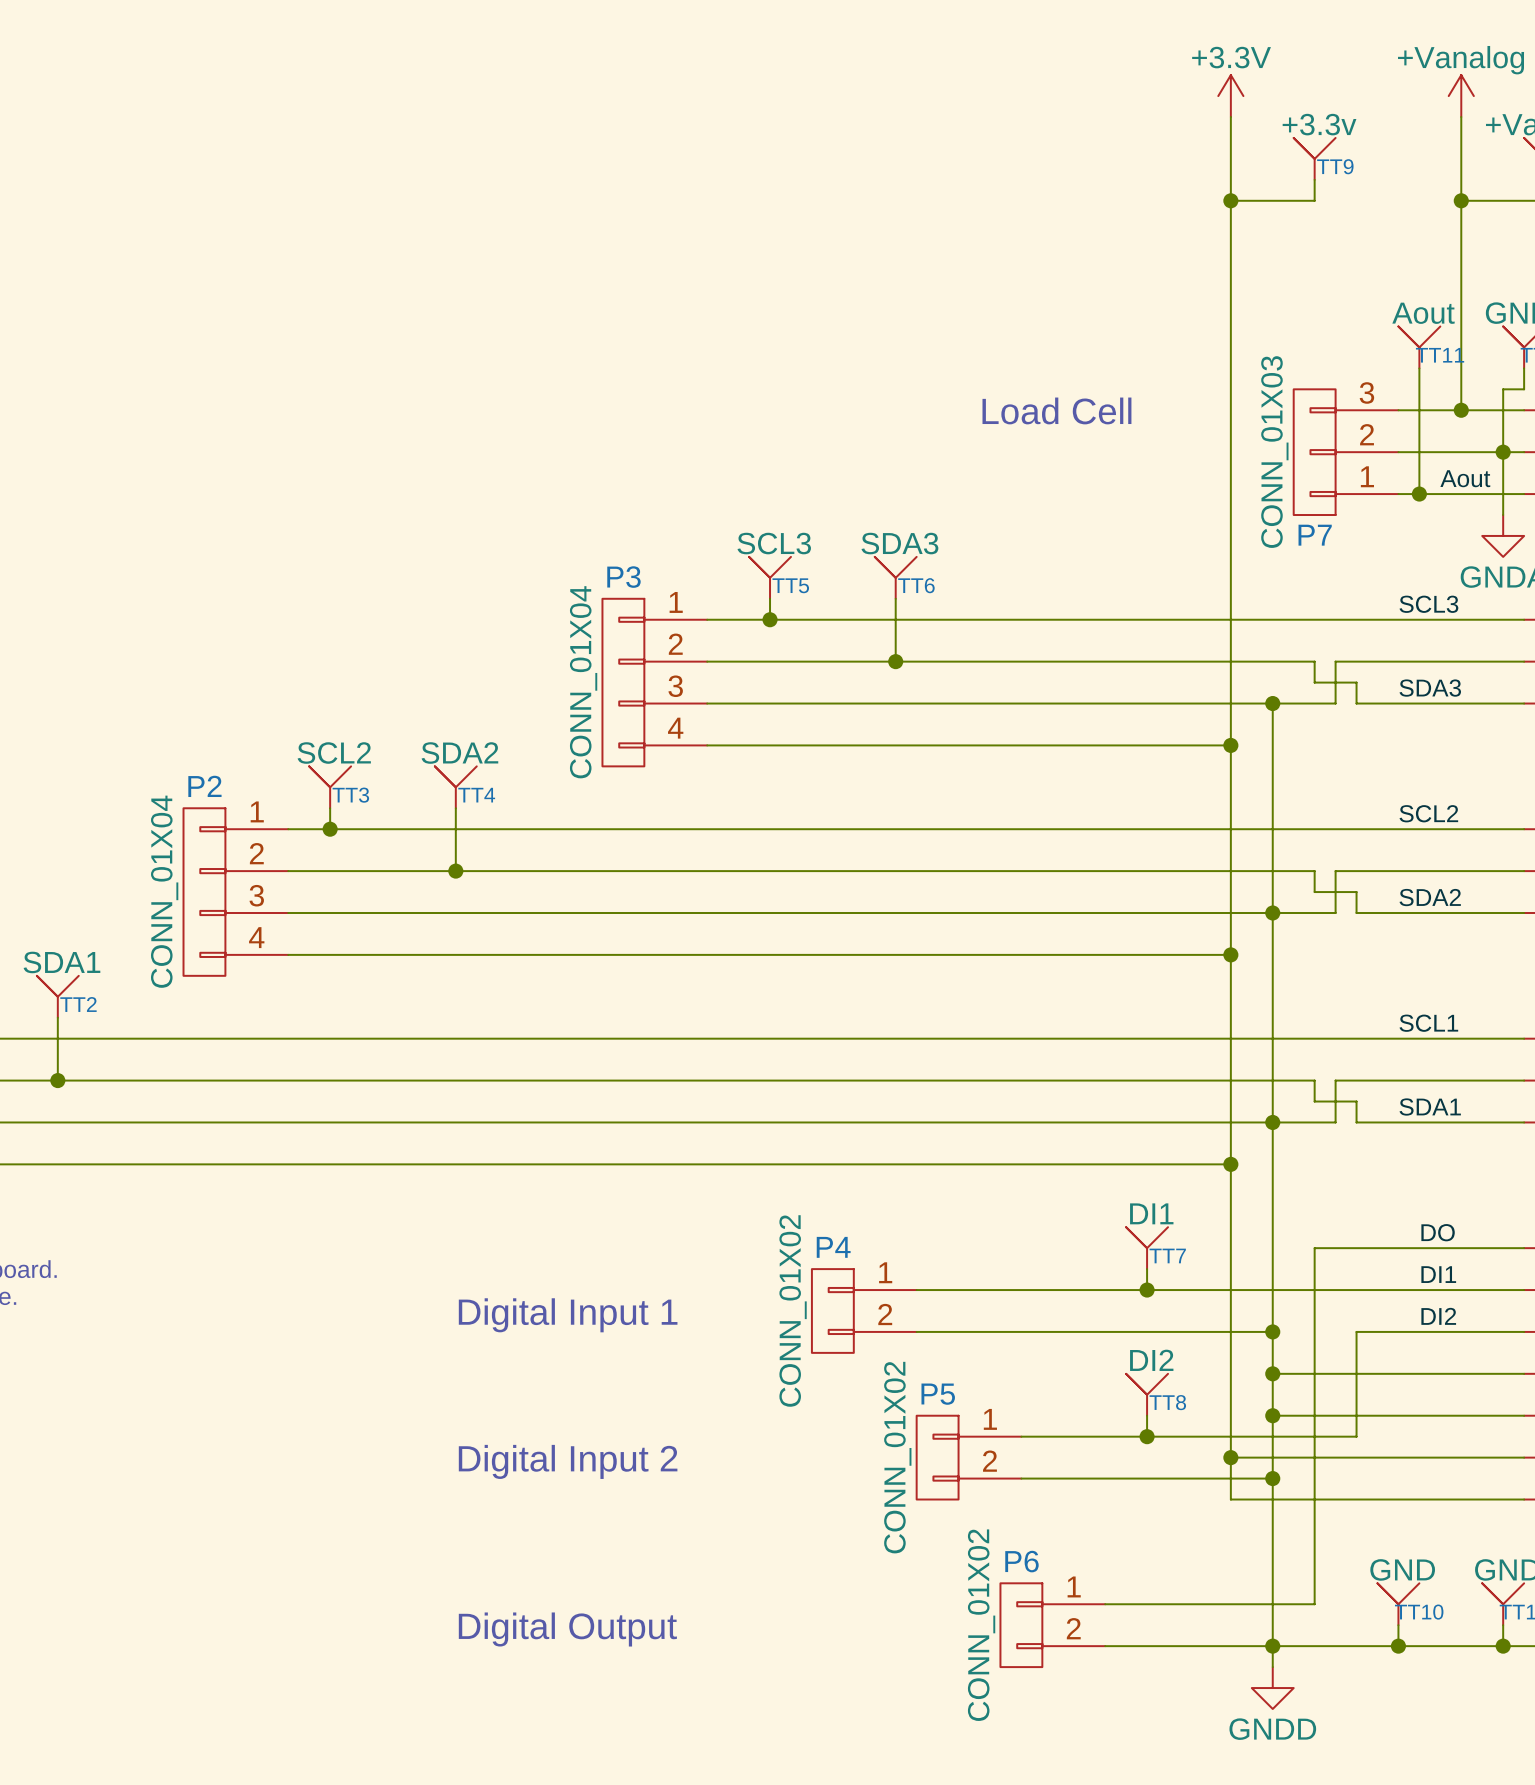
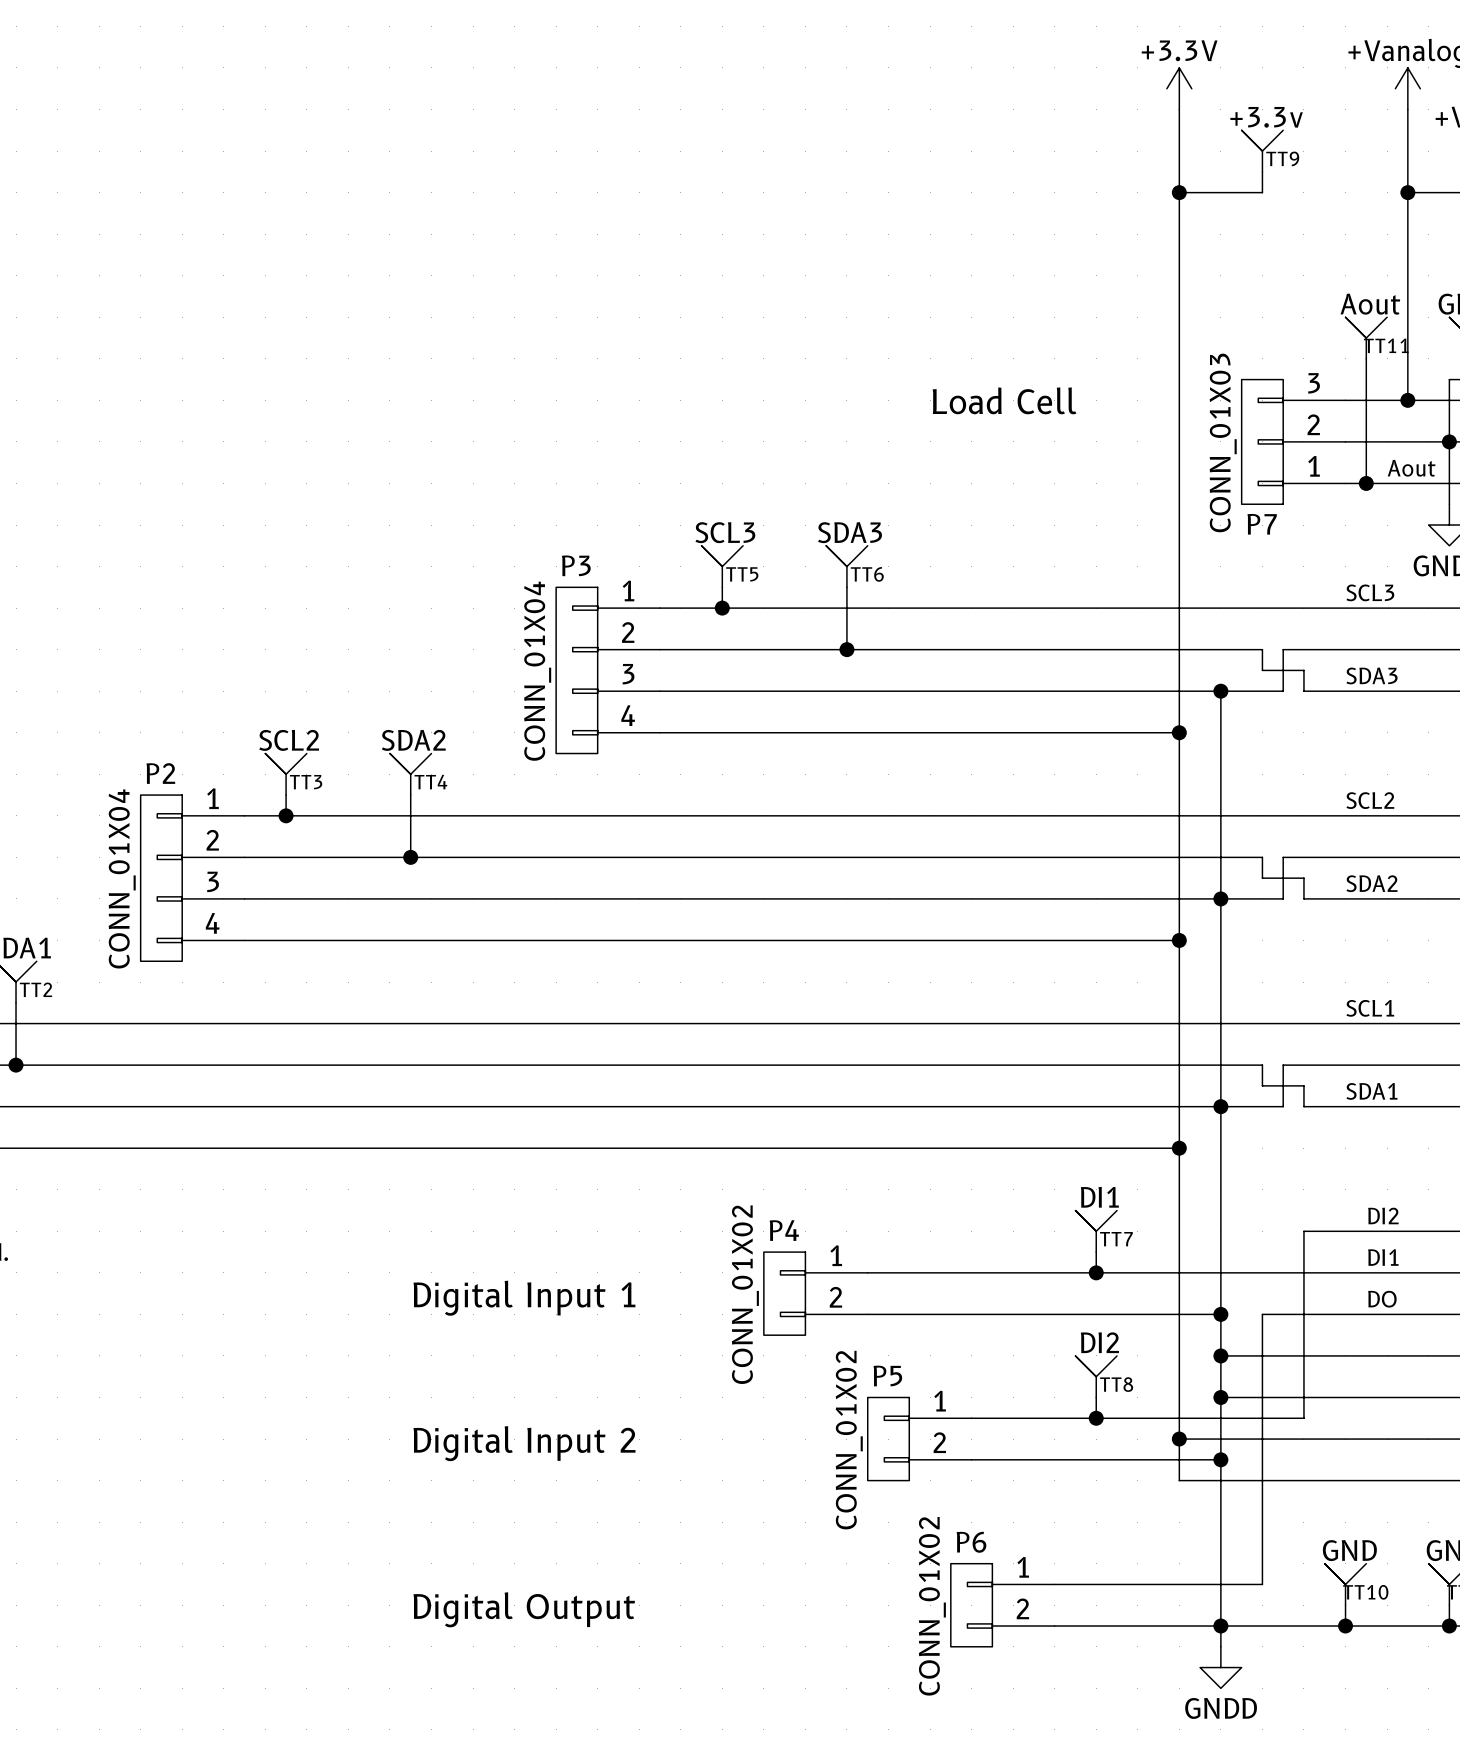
label: DO (1438, 1232) -> DI2 (1383, 1215)
wire: (1356, 1248) (1314, 1248) (1314, 1331) -> (1303, 1231) (1303, 1314) (1262, 1314)
label: DI2 (1438, 1316) -> DO (1382, 1299)

